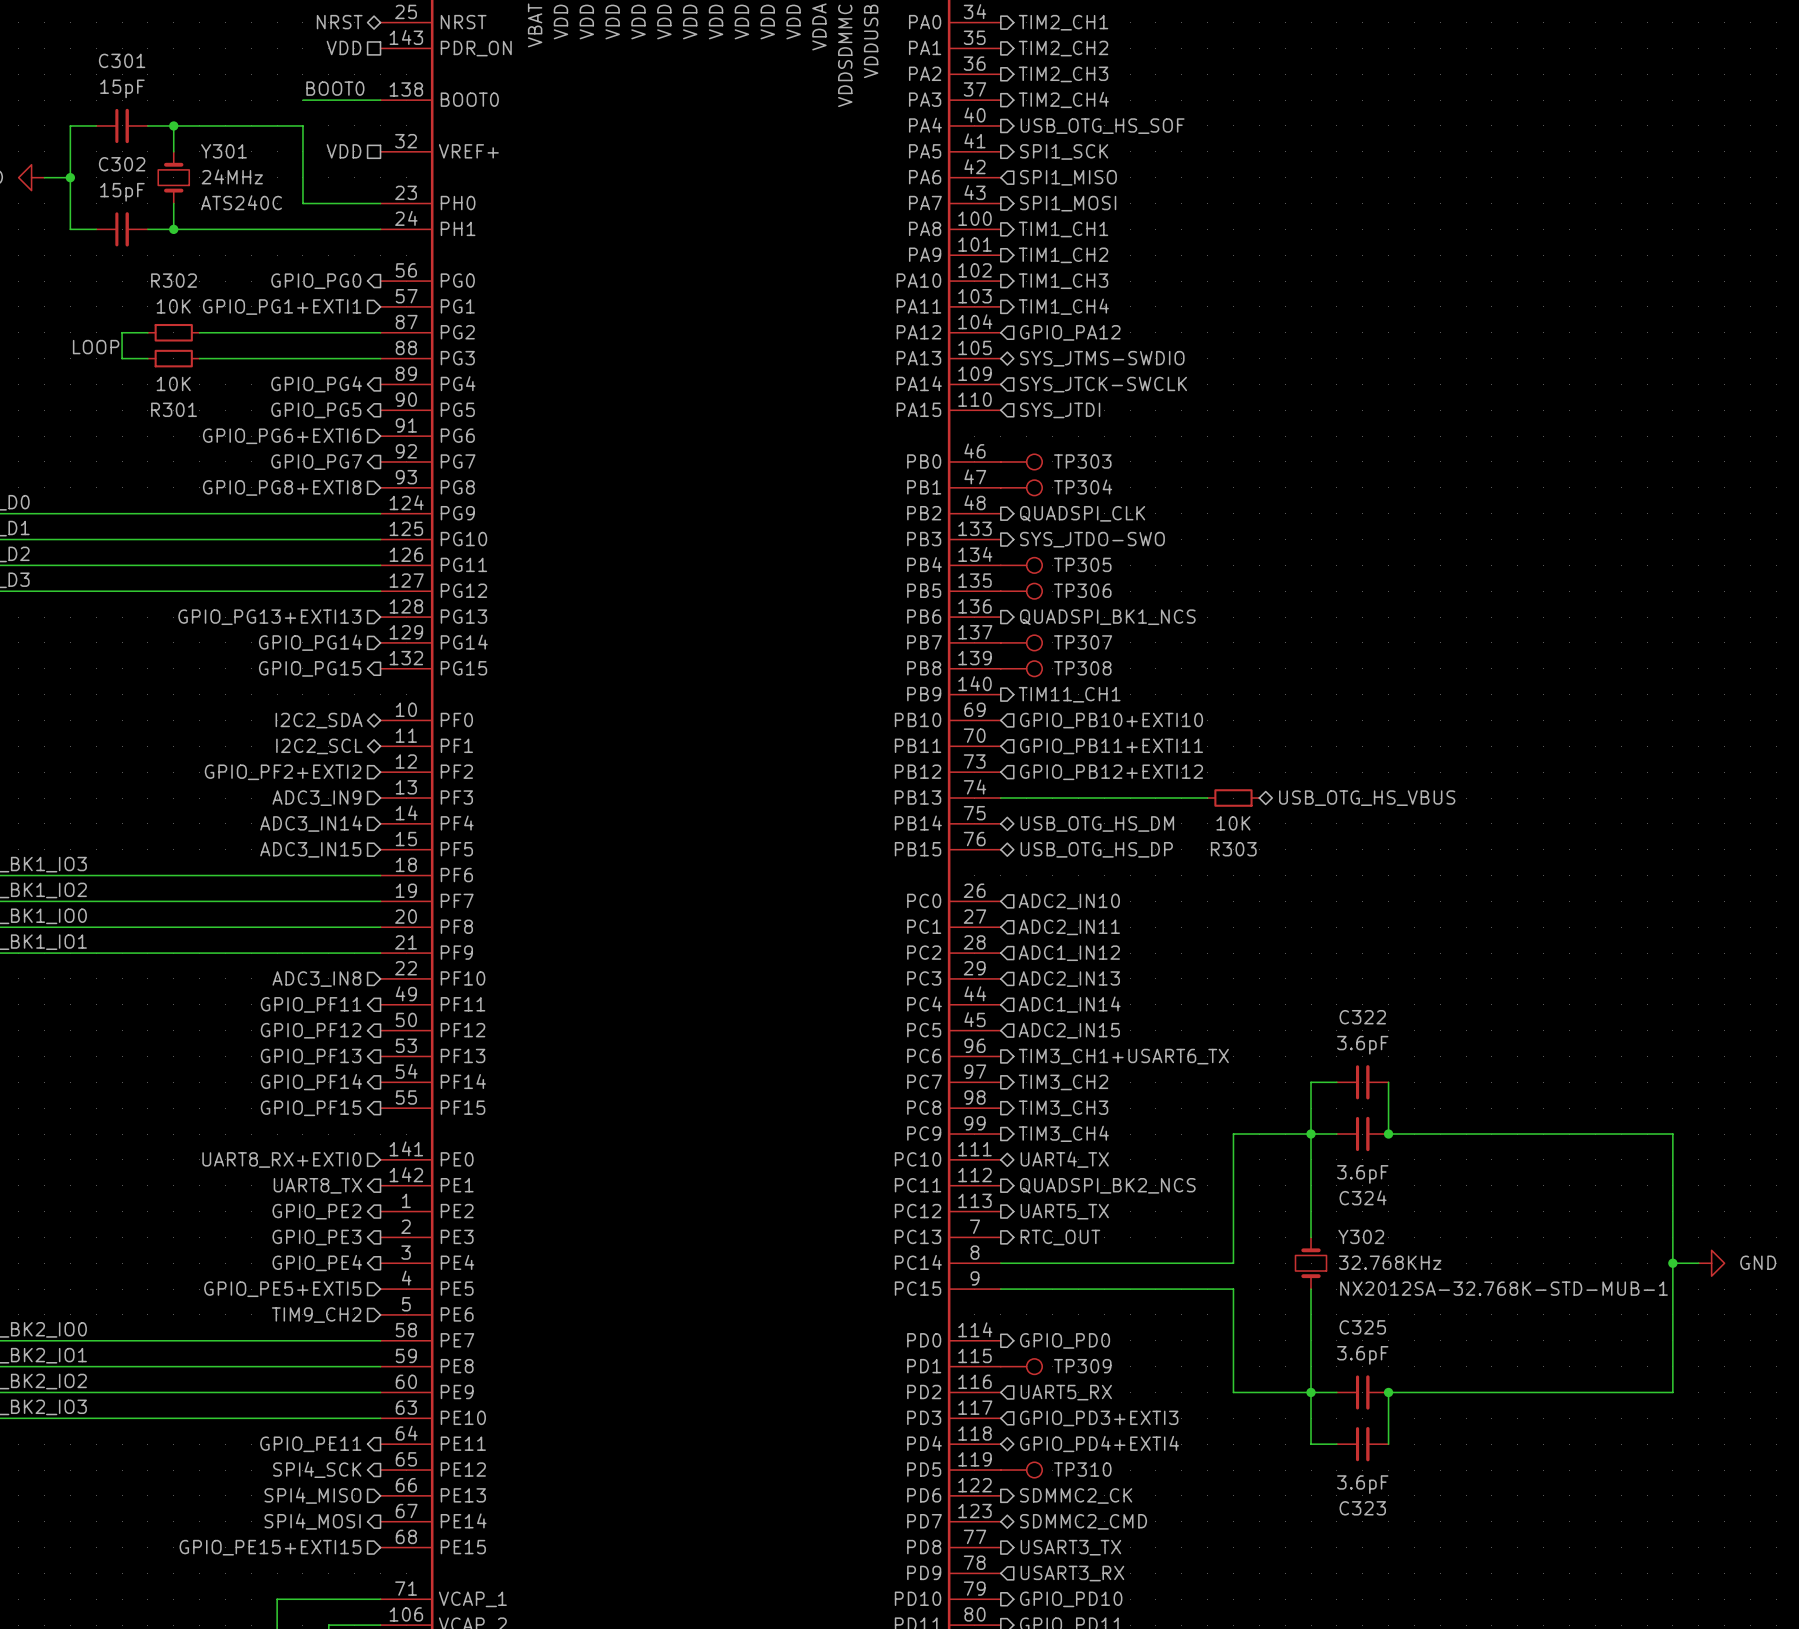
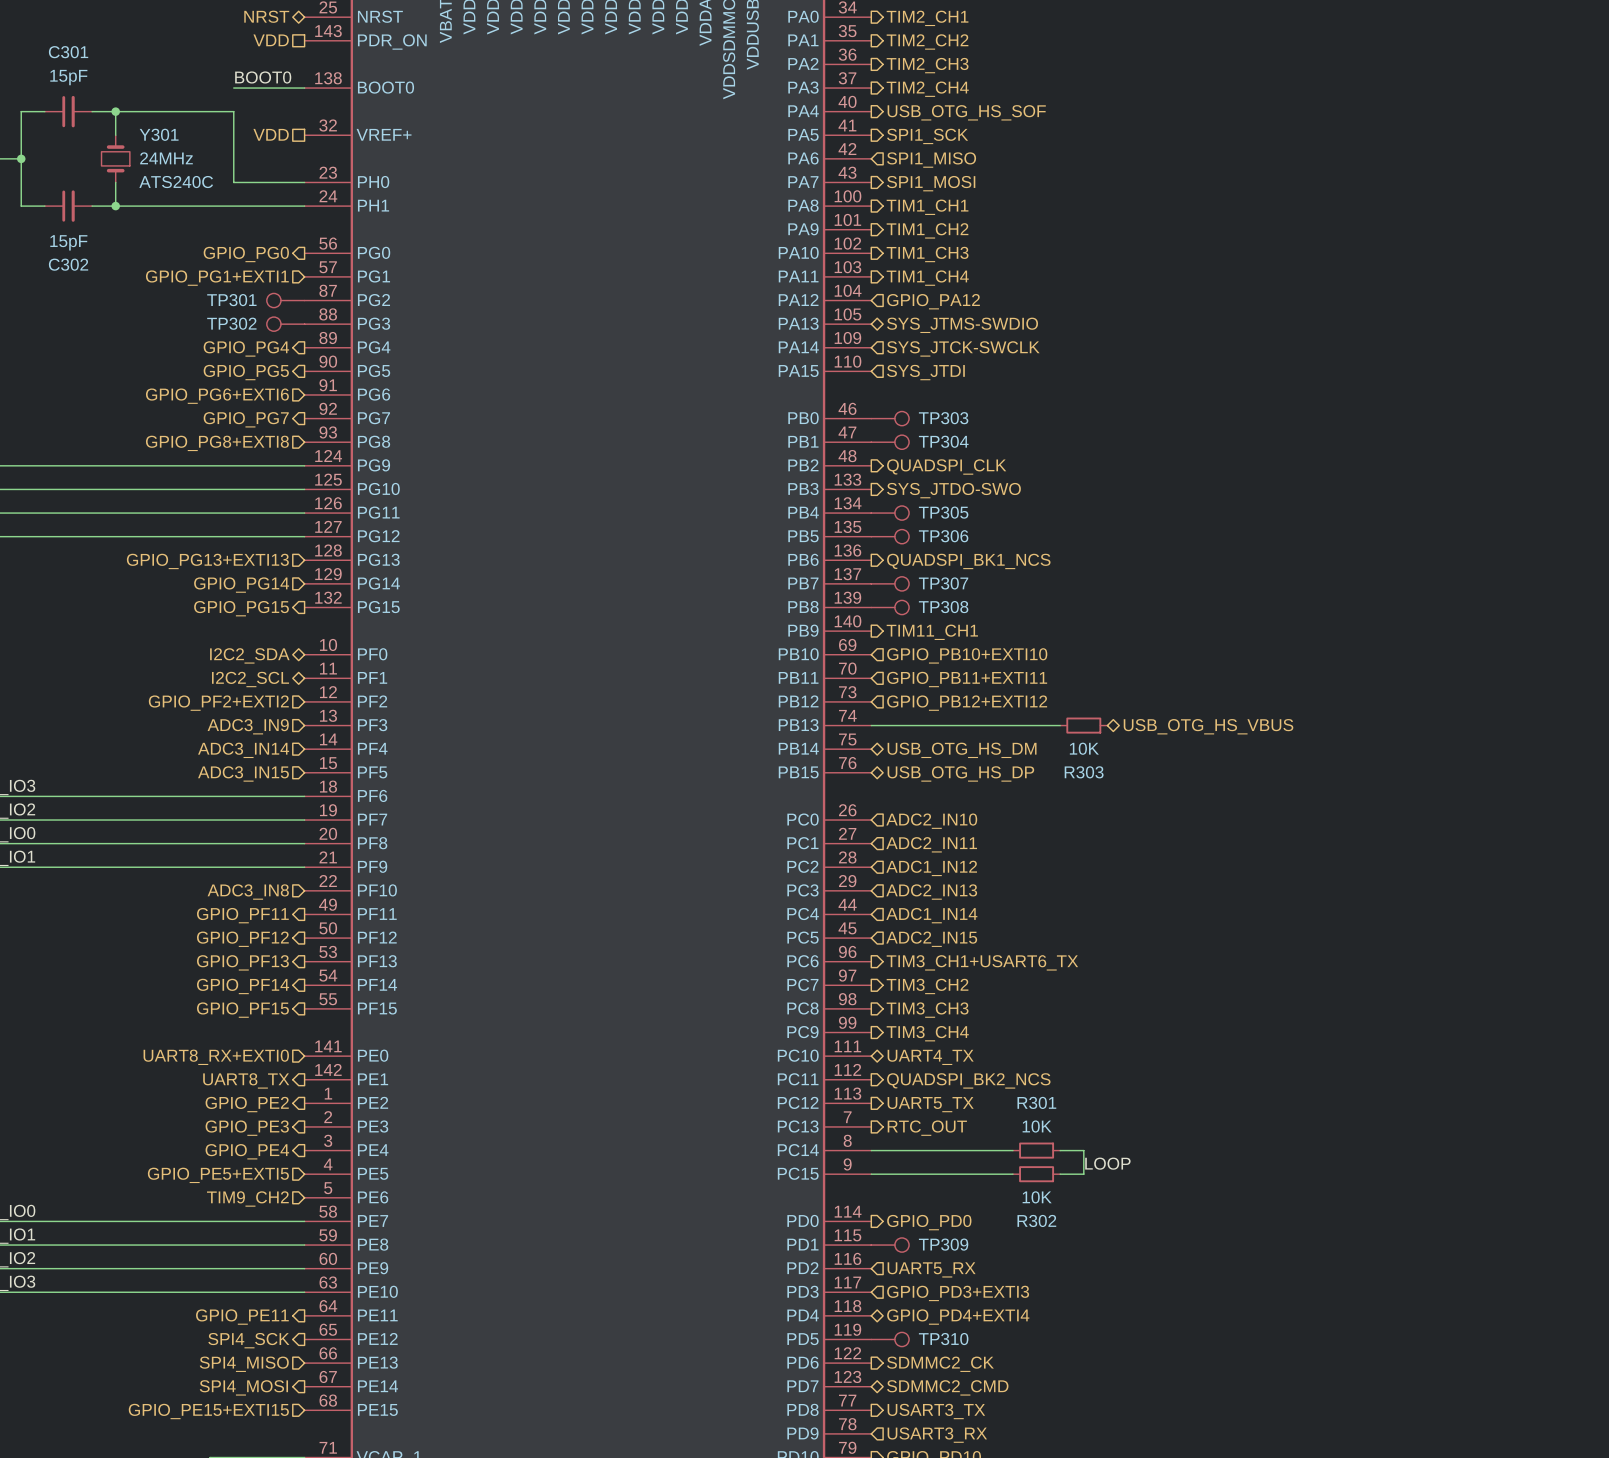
C302 name position: C302 (122, 164) -> C302 (68, 264)
C302 value position: 15pF (122, 192) -> 15pF (68, 242)
R302 name position: R302 (174, 280) -> R302 (1036, 1220)
R302 value position: 10K (173, 306) -> 10K (1037, 1197)
wire: (147, 332) (122, 332) (122, 358) (147, 358) -> none
R302 position: (173, 332) -> (1036, 1174)
wire: (199, 332) (380, 332) -> none
TP301: none -> (285, 300)
label: LOOP (96, 347) -> none
R301 position: (173, 358) -> (1036, 1150)
wire: (199, 358) (380, 358) -> none
TP302: none -> (285, 324)
R301 value position: 10K (173, 383) -> 10K (1037, 1126)
R301 name position: R301 (174, 409) -> R301 (1036, 1102)
wire: (1336, 1082) (1311, 1082) (1311, 1237) -> none
C322: 3.6pF (1362, 1082) -> none
wire: (1388, 1082) (1388, 1134) (1672, 1134) (1672, 1392) (1388, 1392) (1388, 1444) -> none
junction: (1311, 1134) -> none
wire: (1336, 1134) (1233, 1134) (1233, 1263) -> none
C324: 3.6pF (1362, 1134) -> none
junction: (1388, 1134) -> none
wire: (1155, 1263) (1207, 1263) -> none
Y302: 32.768KHz (1311, 1263) -> none
wire: (1672, 1263) (1698, 1263) -> none
junction: (1672, 1263) -> none
power symbol: GND (1711, 1263) -> none
label: none -> LOOP (1107, 1163)
wire: (1155, 1289) (1207, 1289) -> none
wire: (1233, 1289) (1233, 1392) (1336, 1392) -> (1083, 1174) (1083, 1150)
wire: (1311, 1289) (1311, 1444) (1336, 1444) -> none
junction: (1311, 1392) -> none
C325: 3.6pF (1362, 1392) -> none
junction: (1388, 1392) -> none
C323: 3.6pF (1362, 1444) -> none

